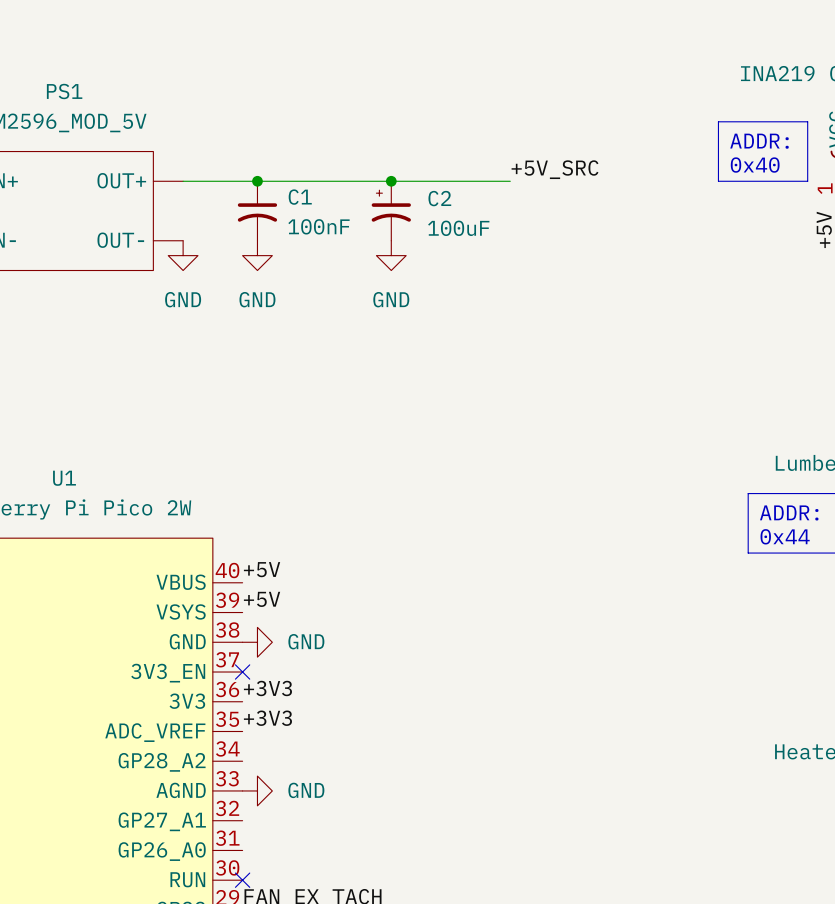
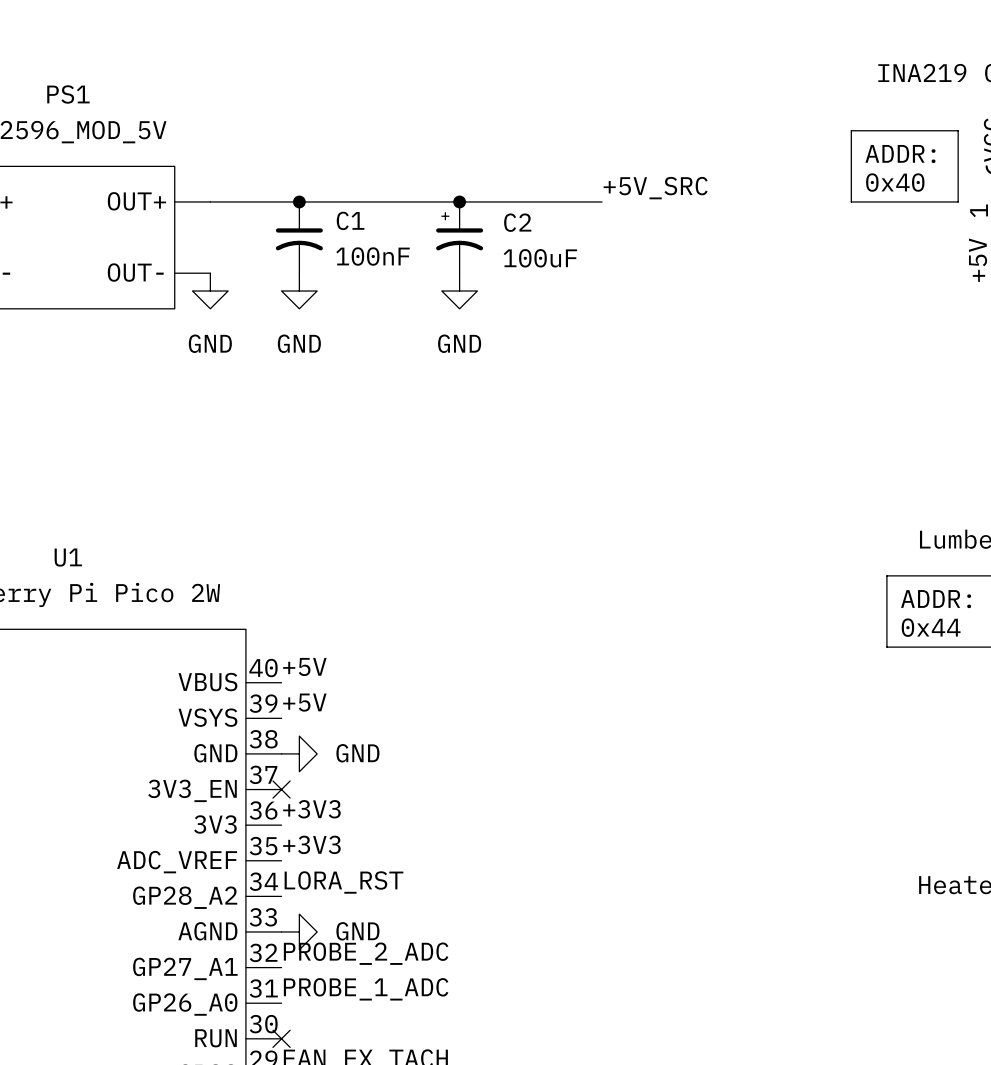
label: none -> LORA_RST (344, 882)
label: none -> PROBE_2_ADC (366, 953)
label: none -> PROBE_1_ADC (366, 989)

